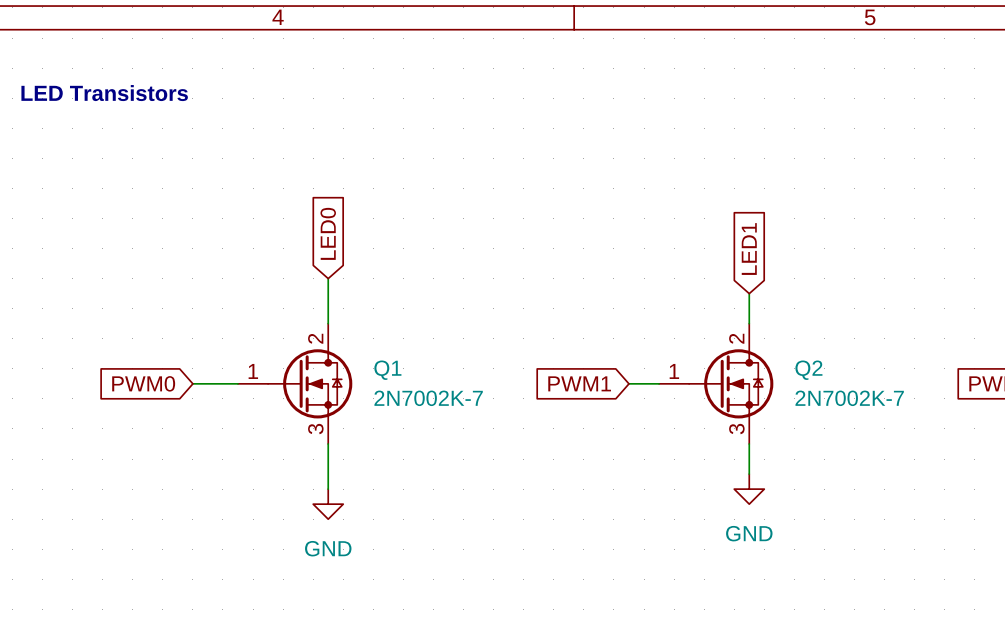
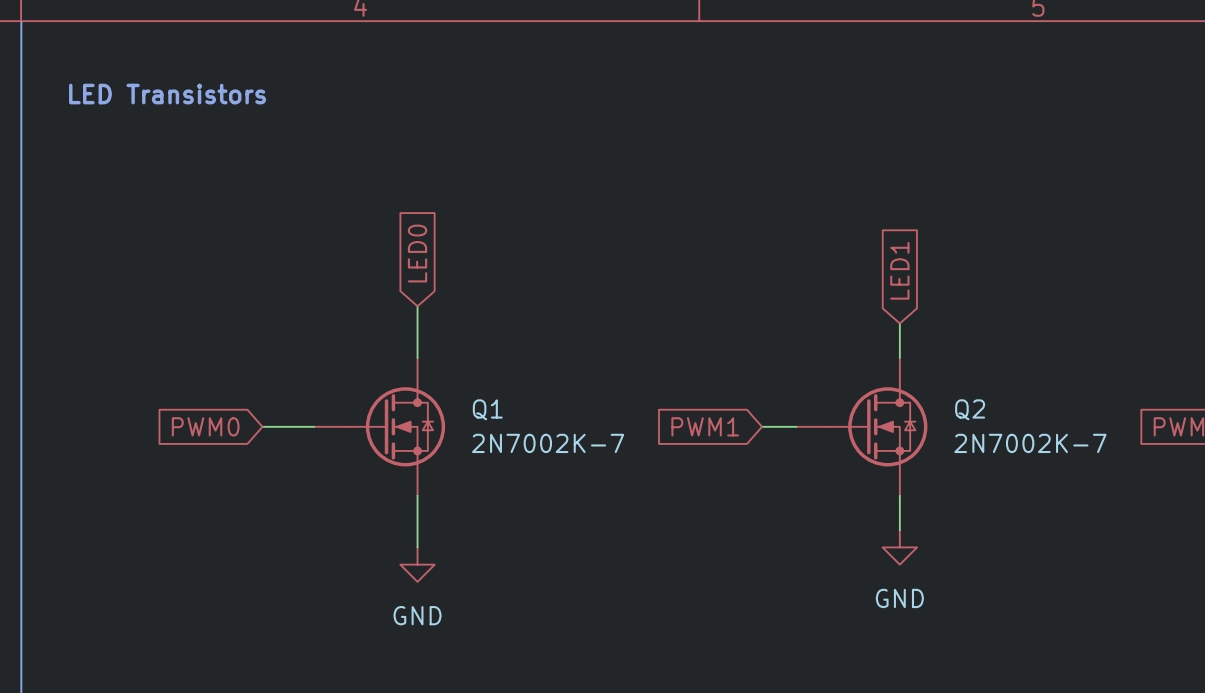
Q1 pin number: 2 (315, 338) -> none
Q2 pin number: 2 (736, 338) -> none
Q1 pin number: 1 (253, 371) -> none
Q2 pin number: 1 (674, 371) -> none
Q1 pin number: 3 (315, 429) -> none
Q2 pin number: 3 (736, 429) -> none

